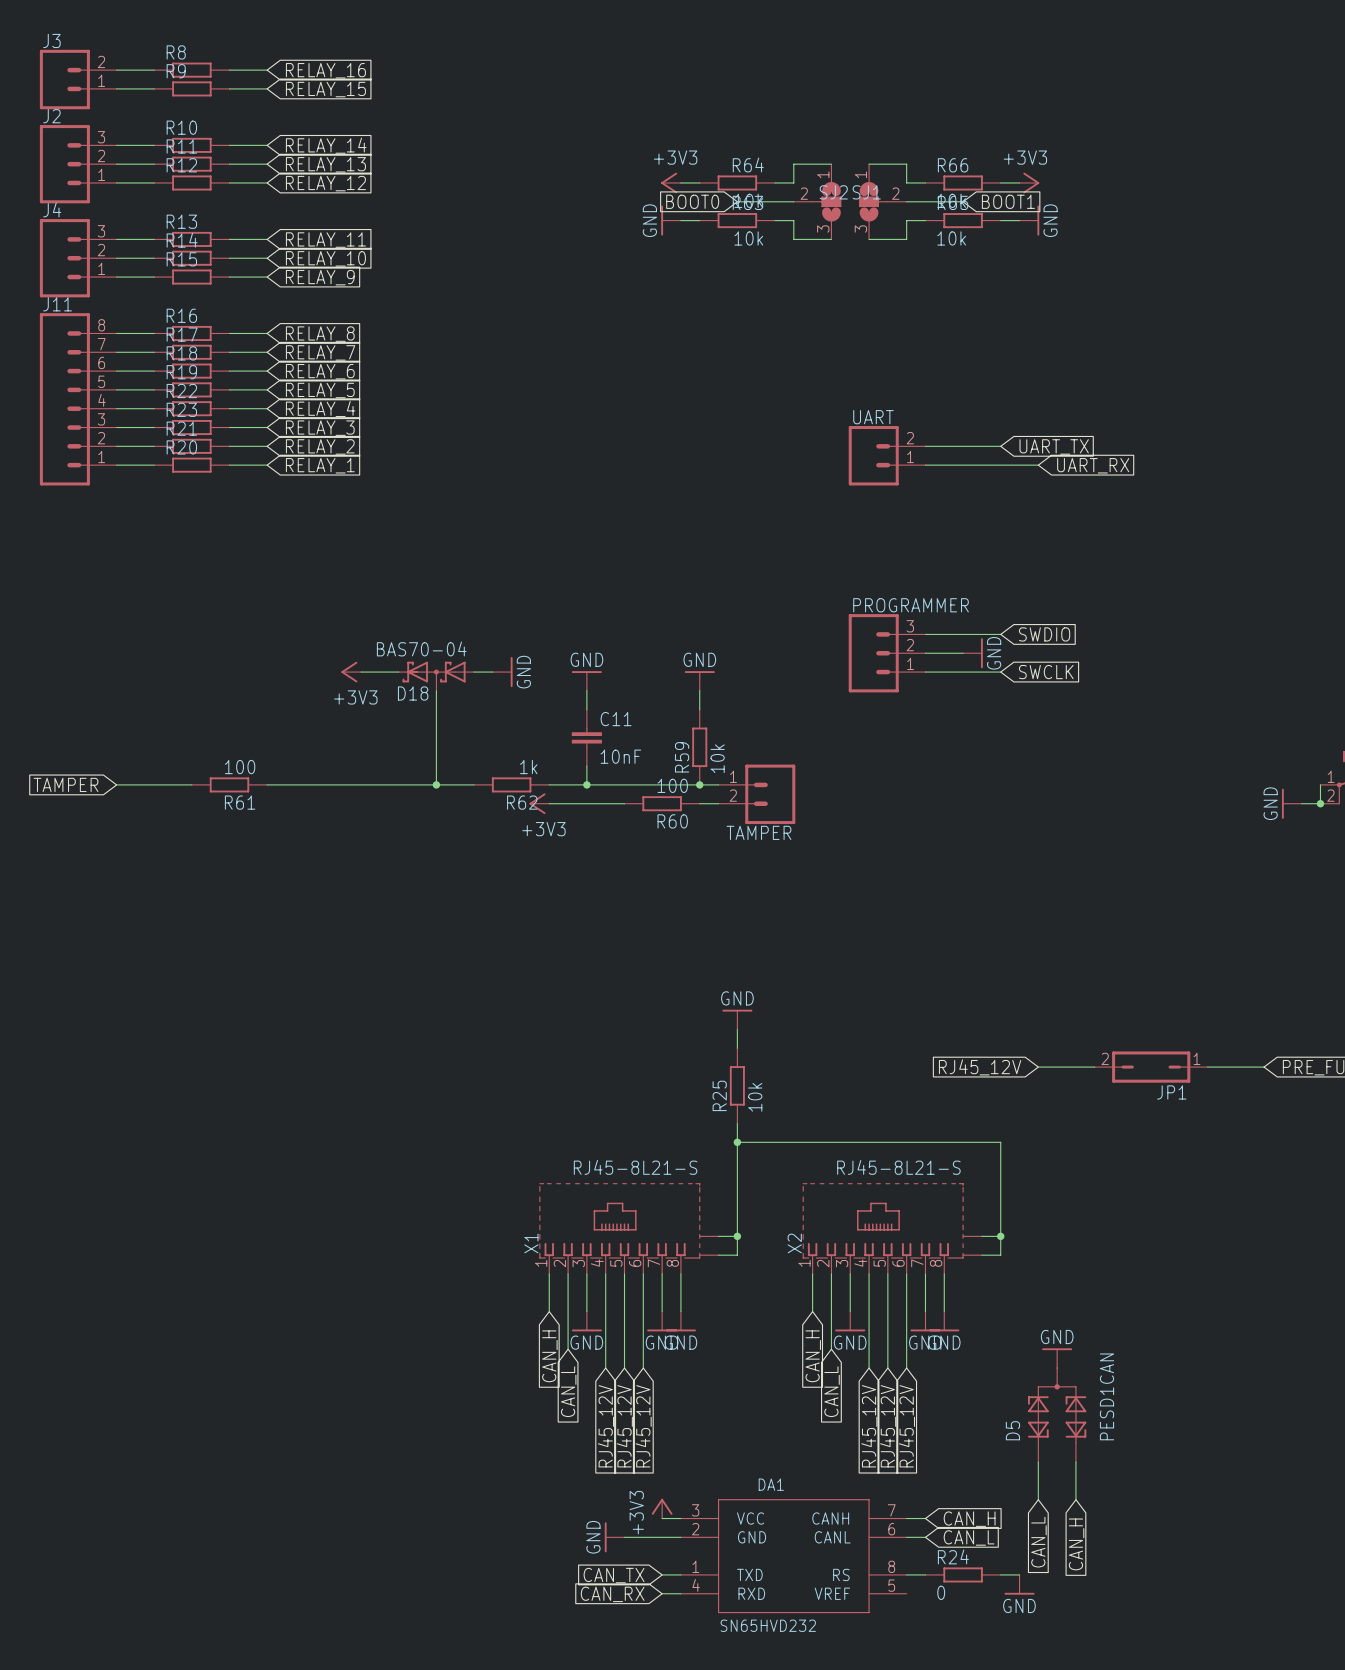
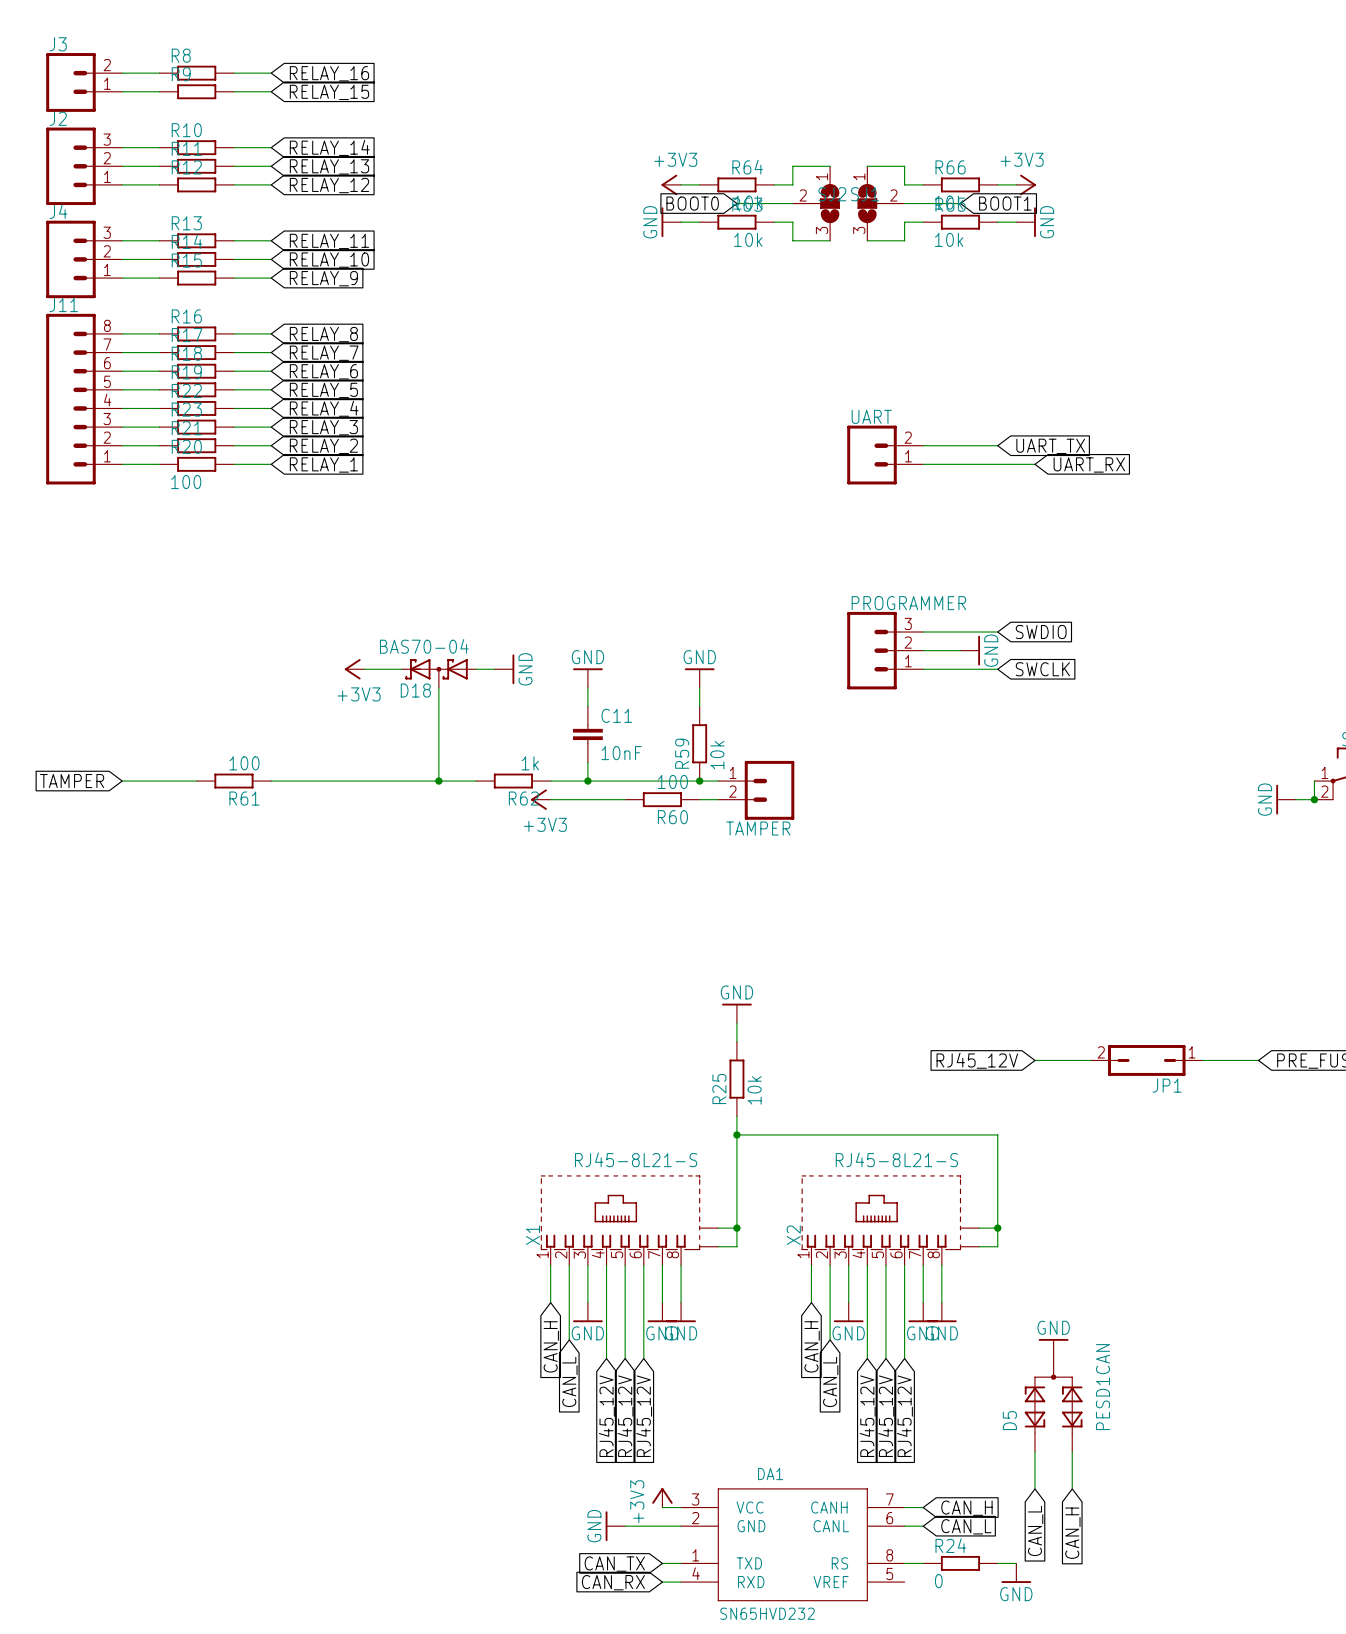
R20 value: none -> 100 (186, 482)

